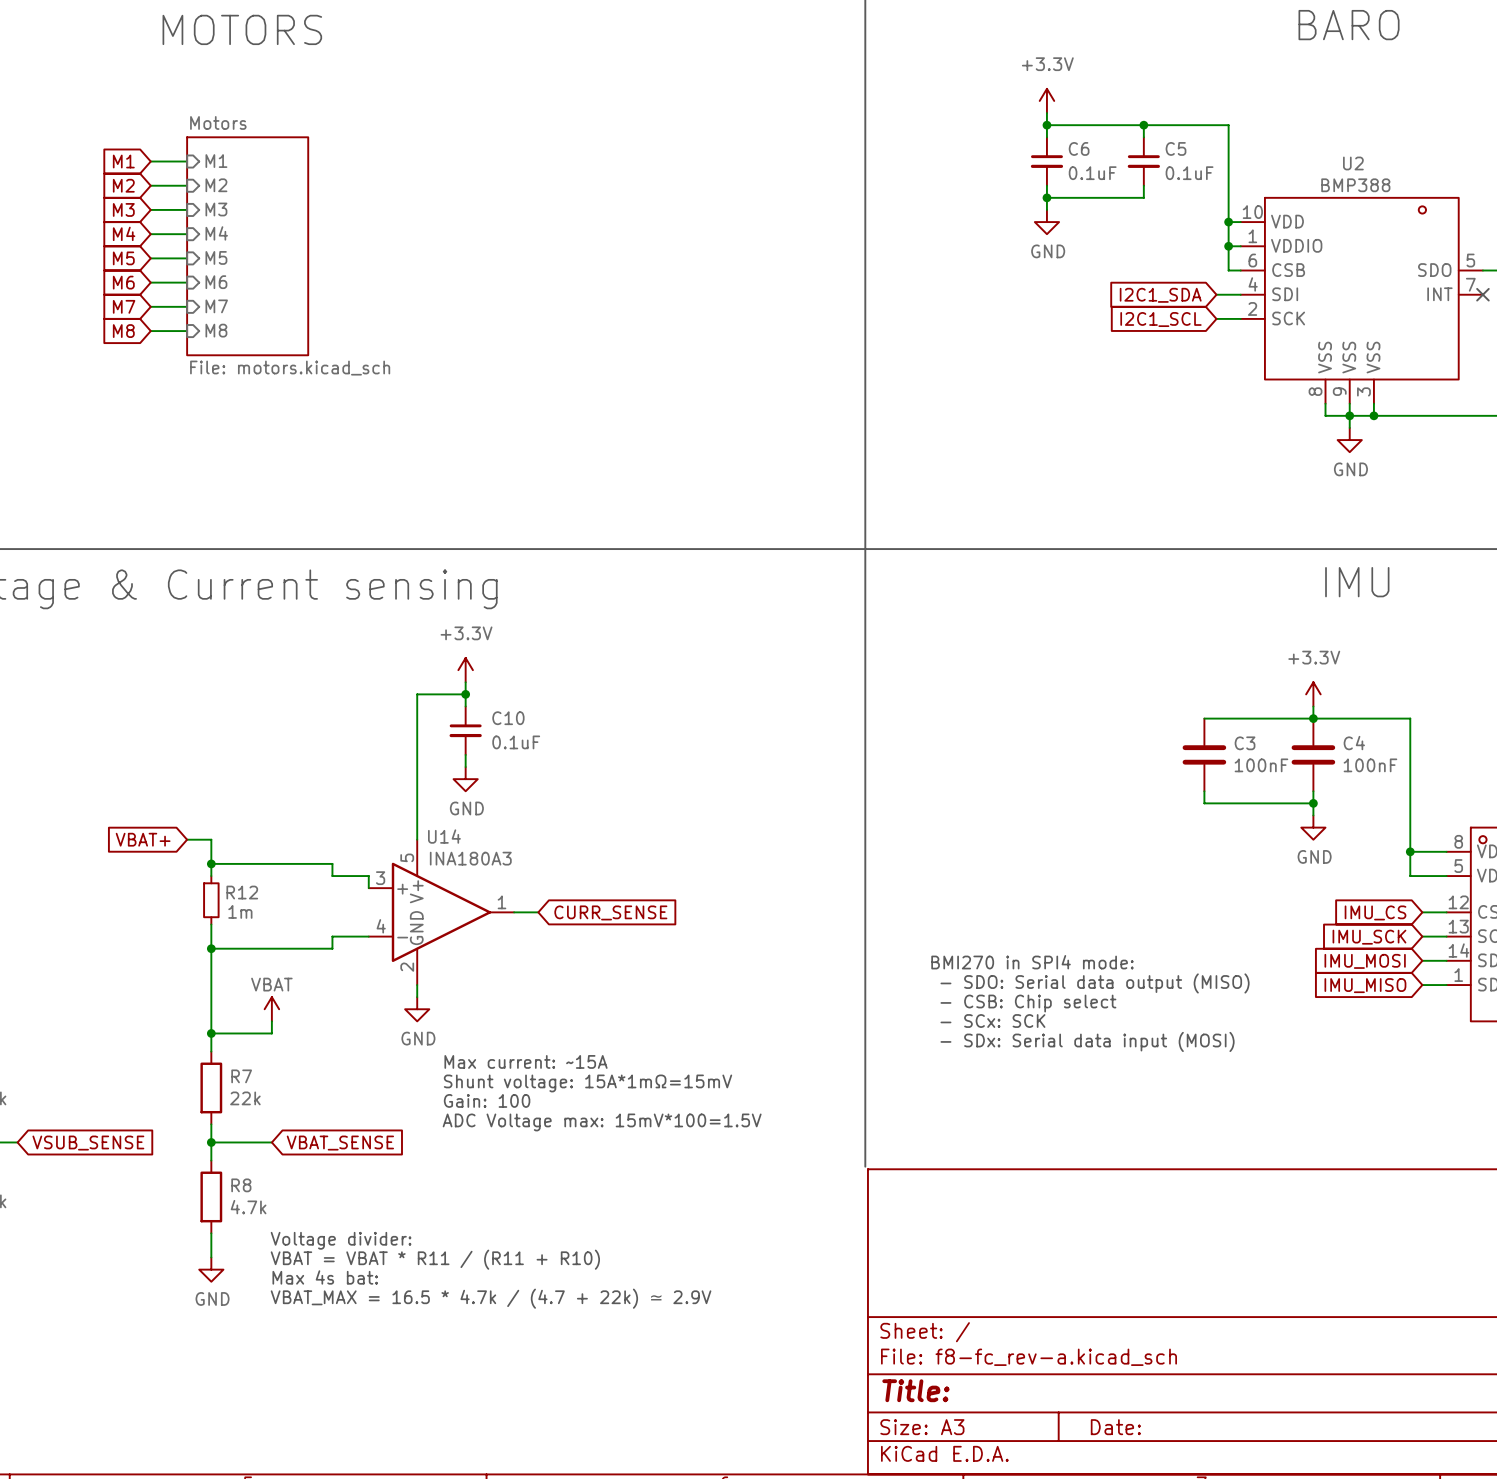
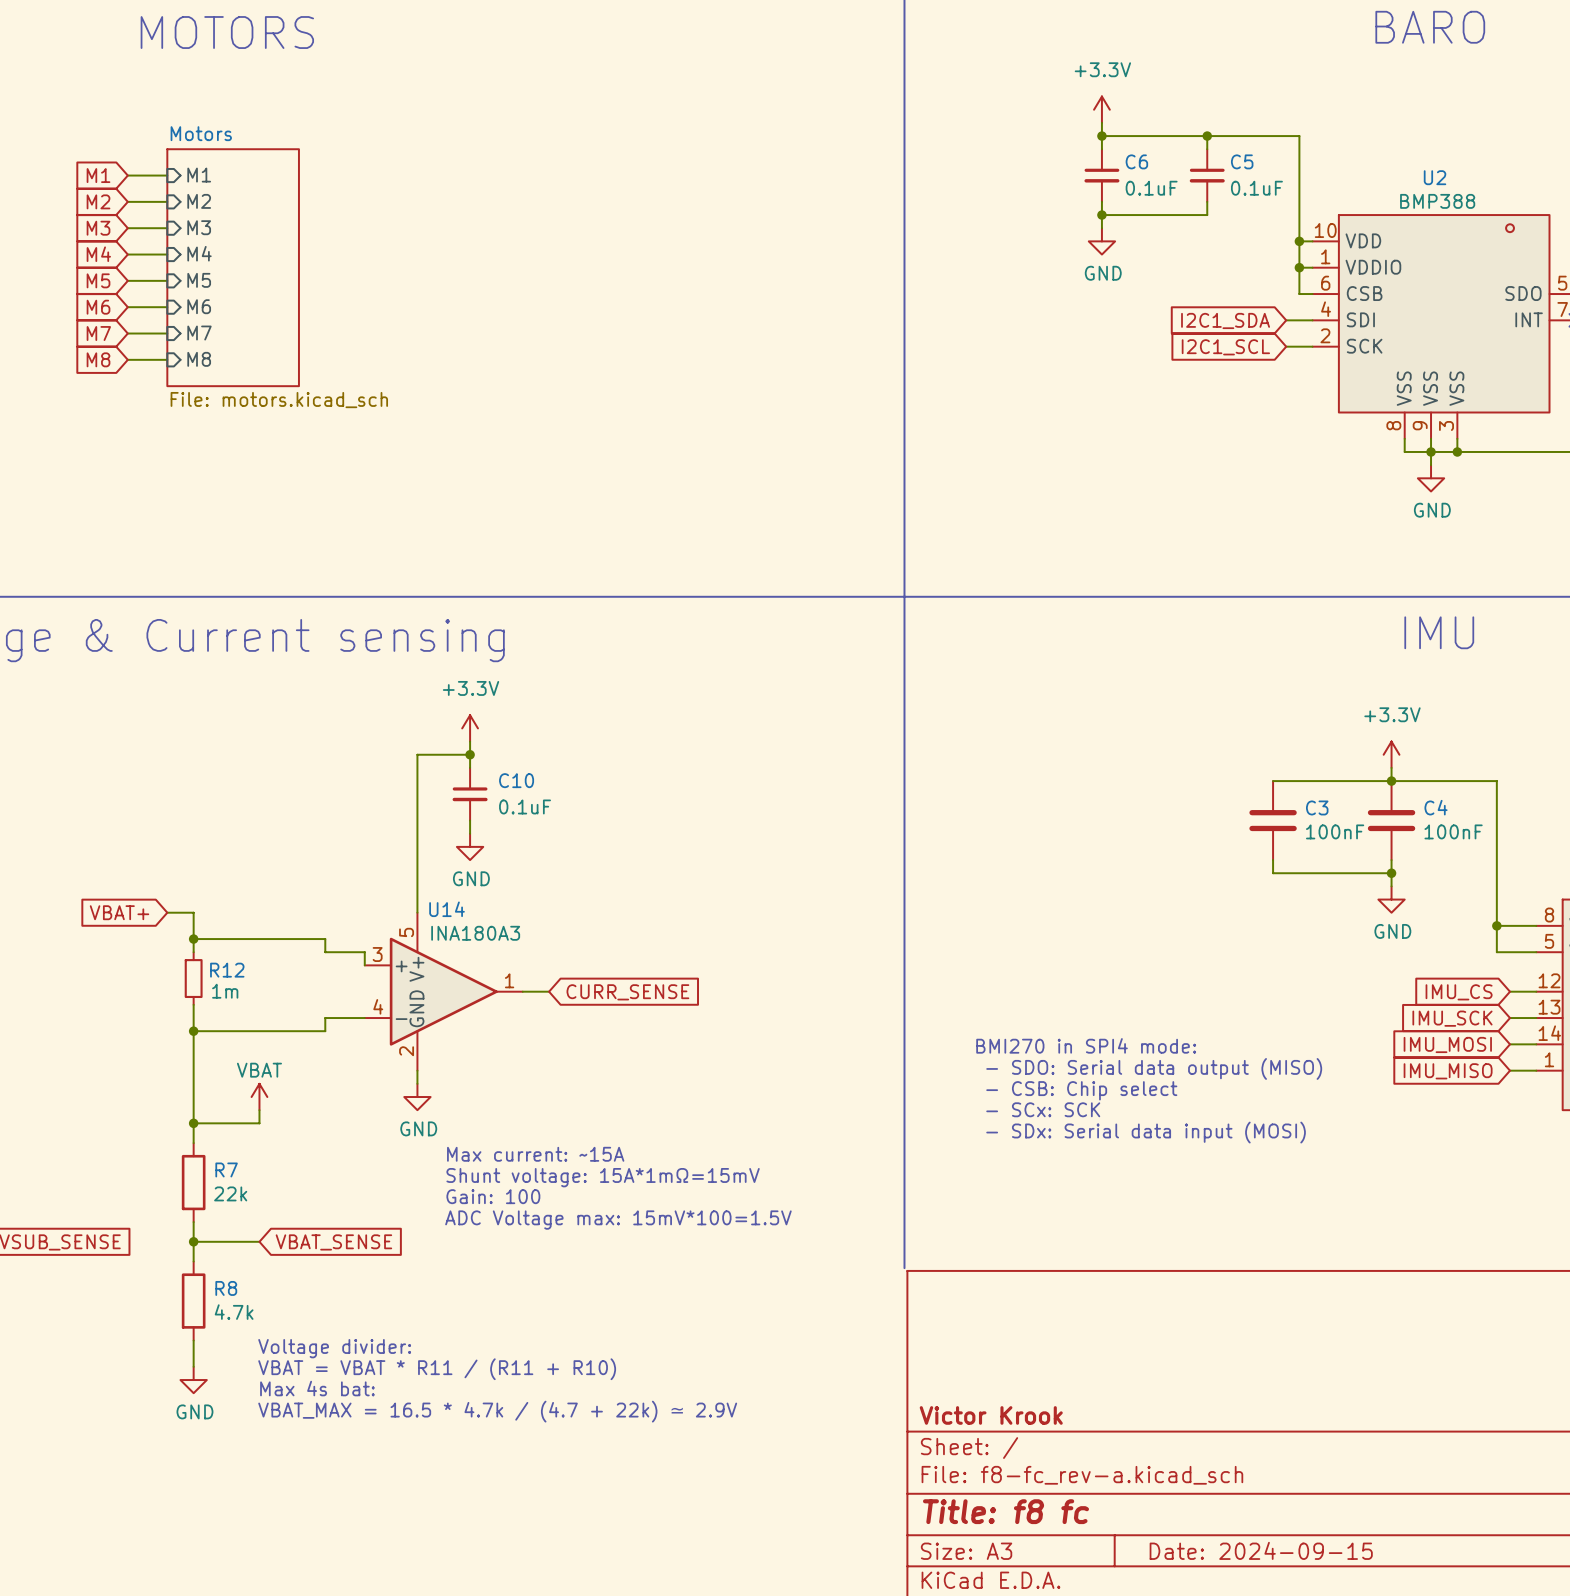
title block: none -> Victor Krook (991, 1415)
title block: Title: (915, 1390) -> Title: f8 fc (1005, 1511)
title block: Date: (1115, 1427) -> Date: 2024-09-15 (1261, 1550)

